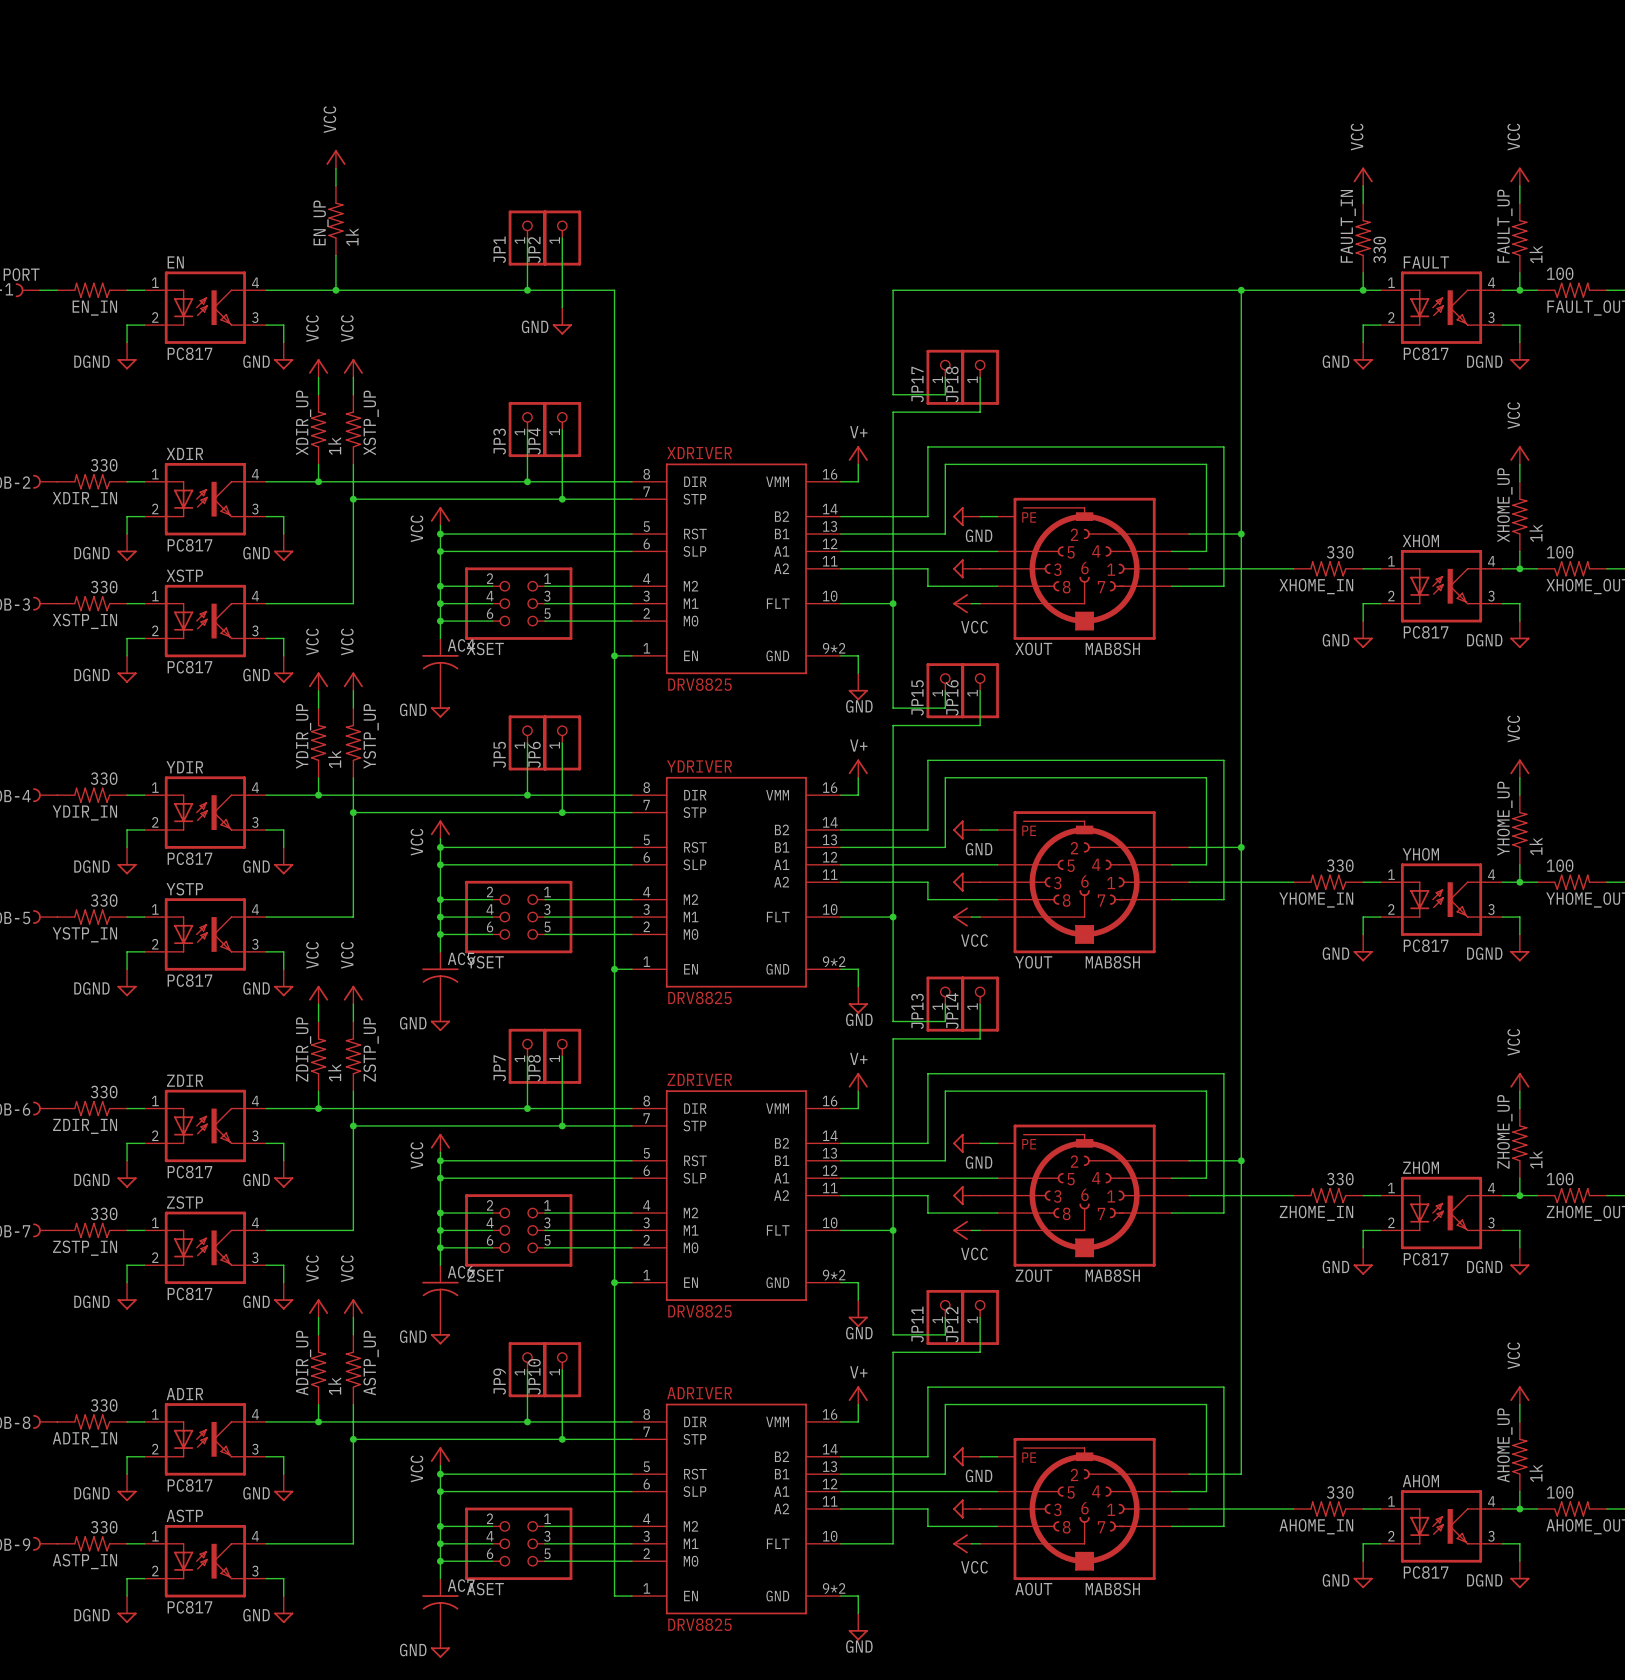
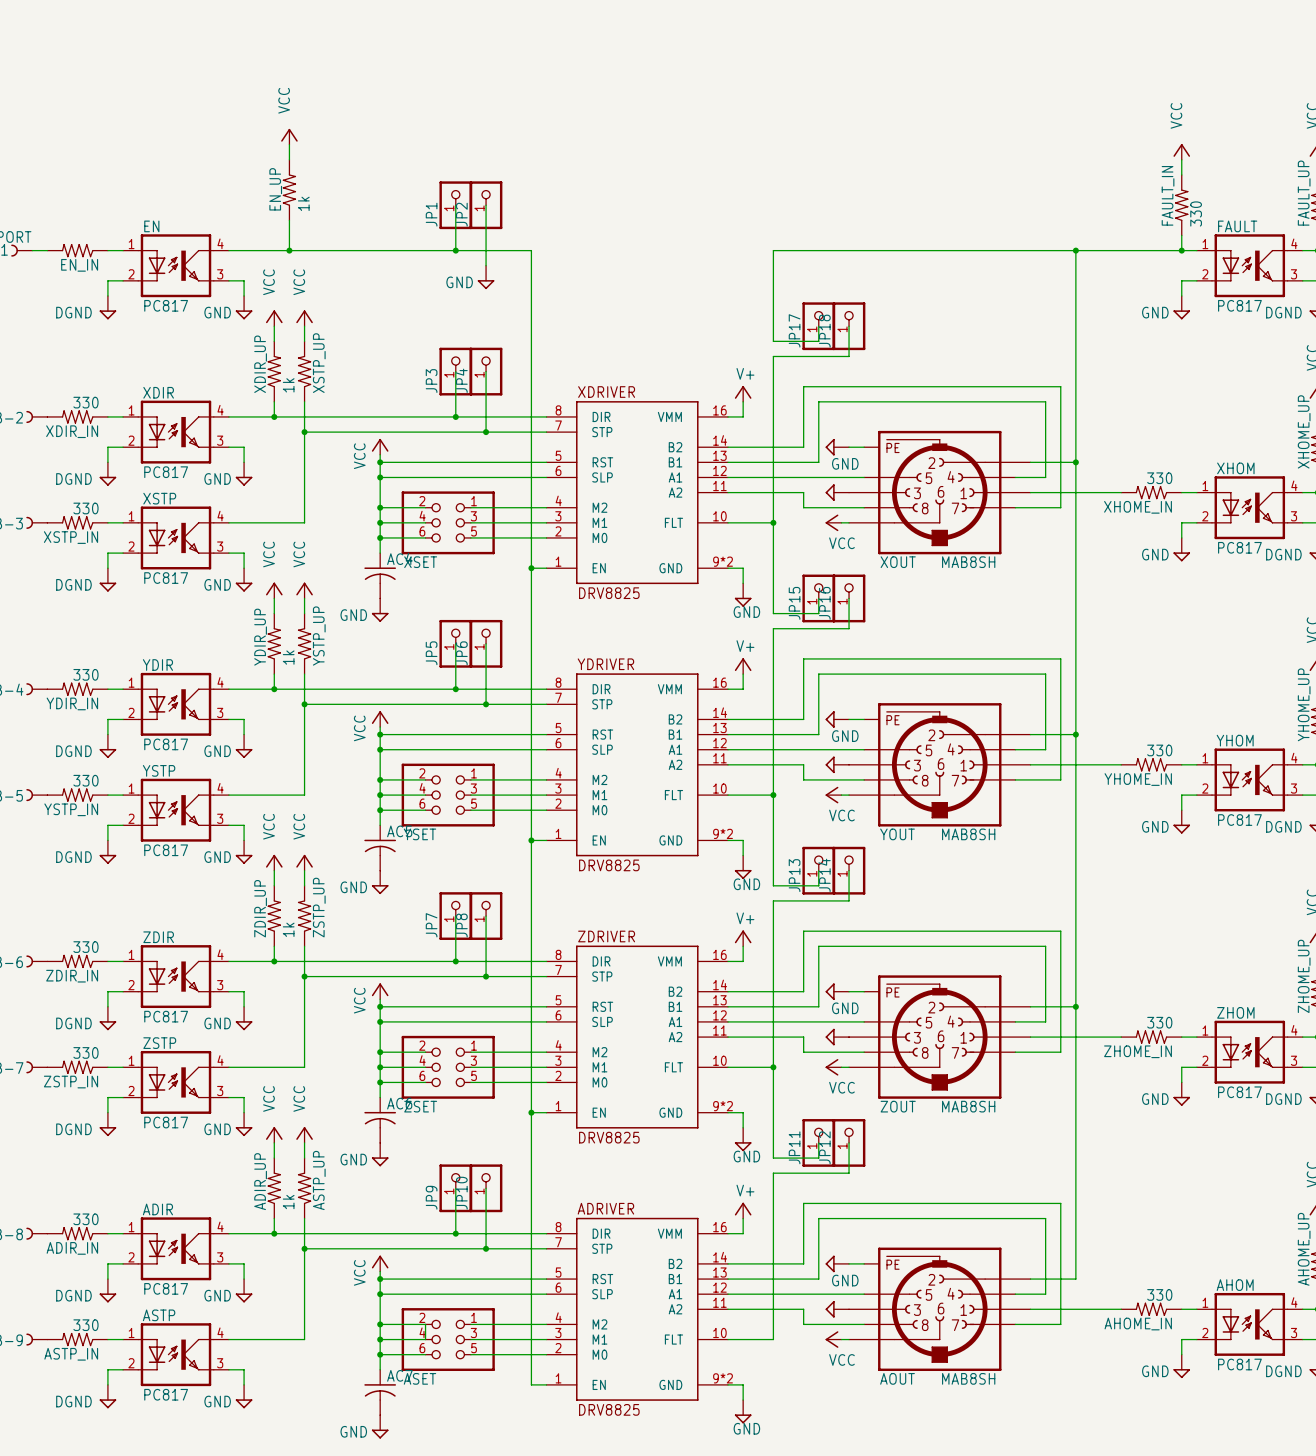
wire: none -> (425, 1324) (425, 1339)

